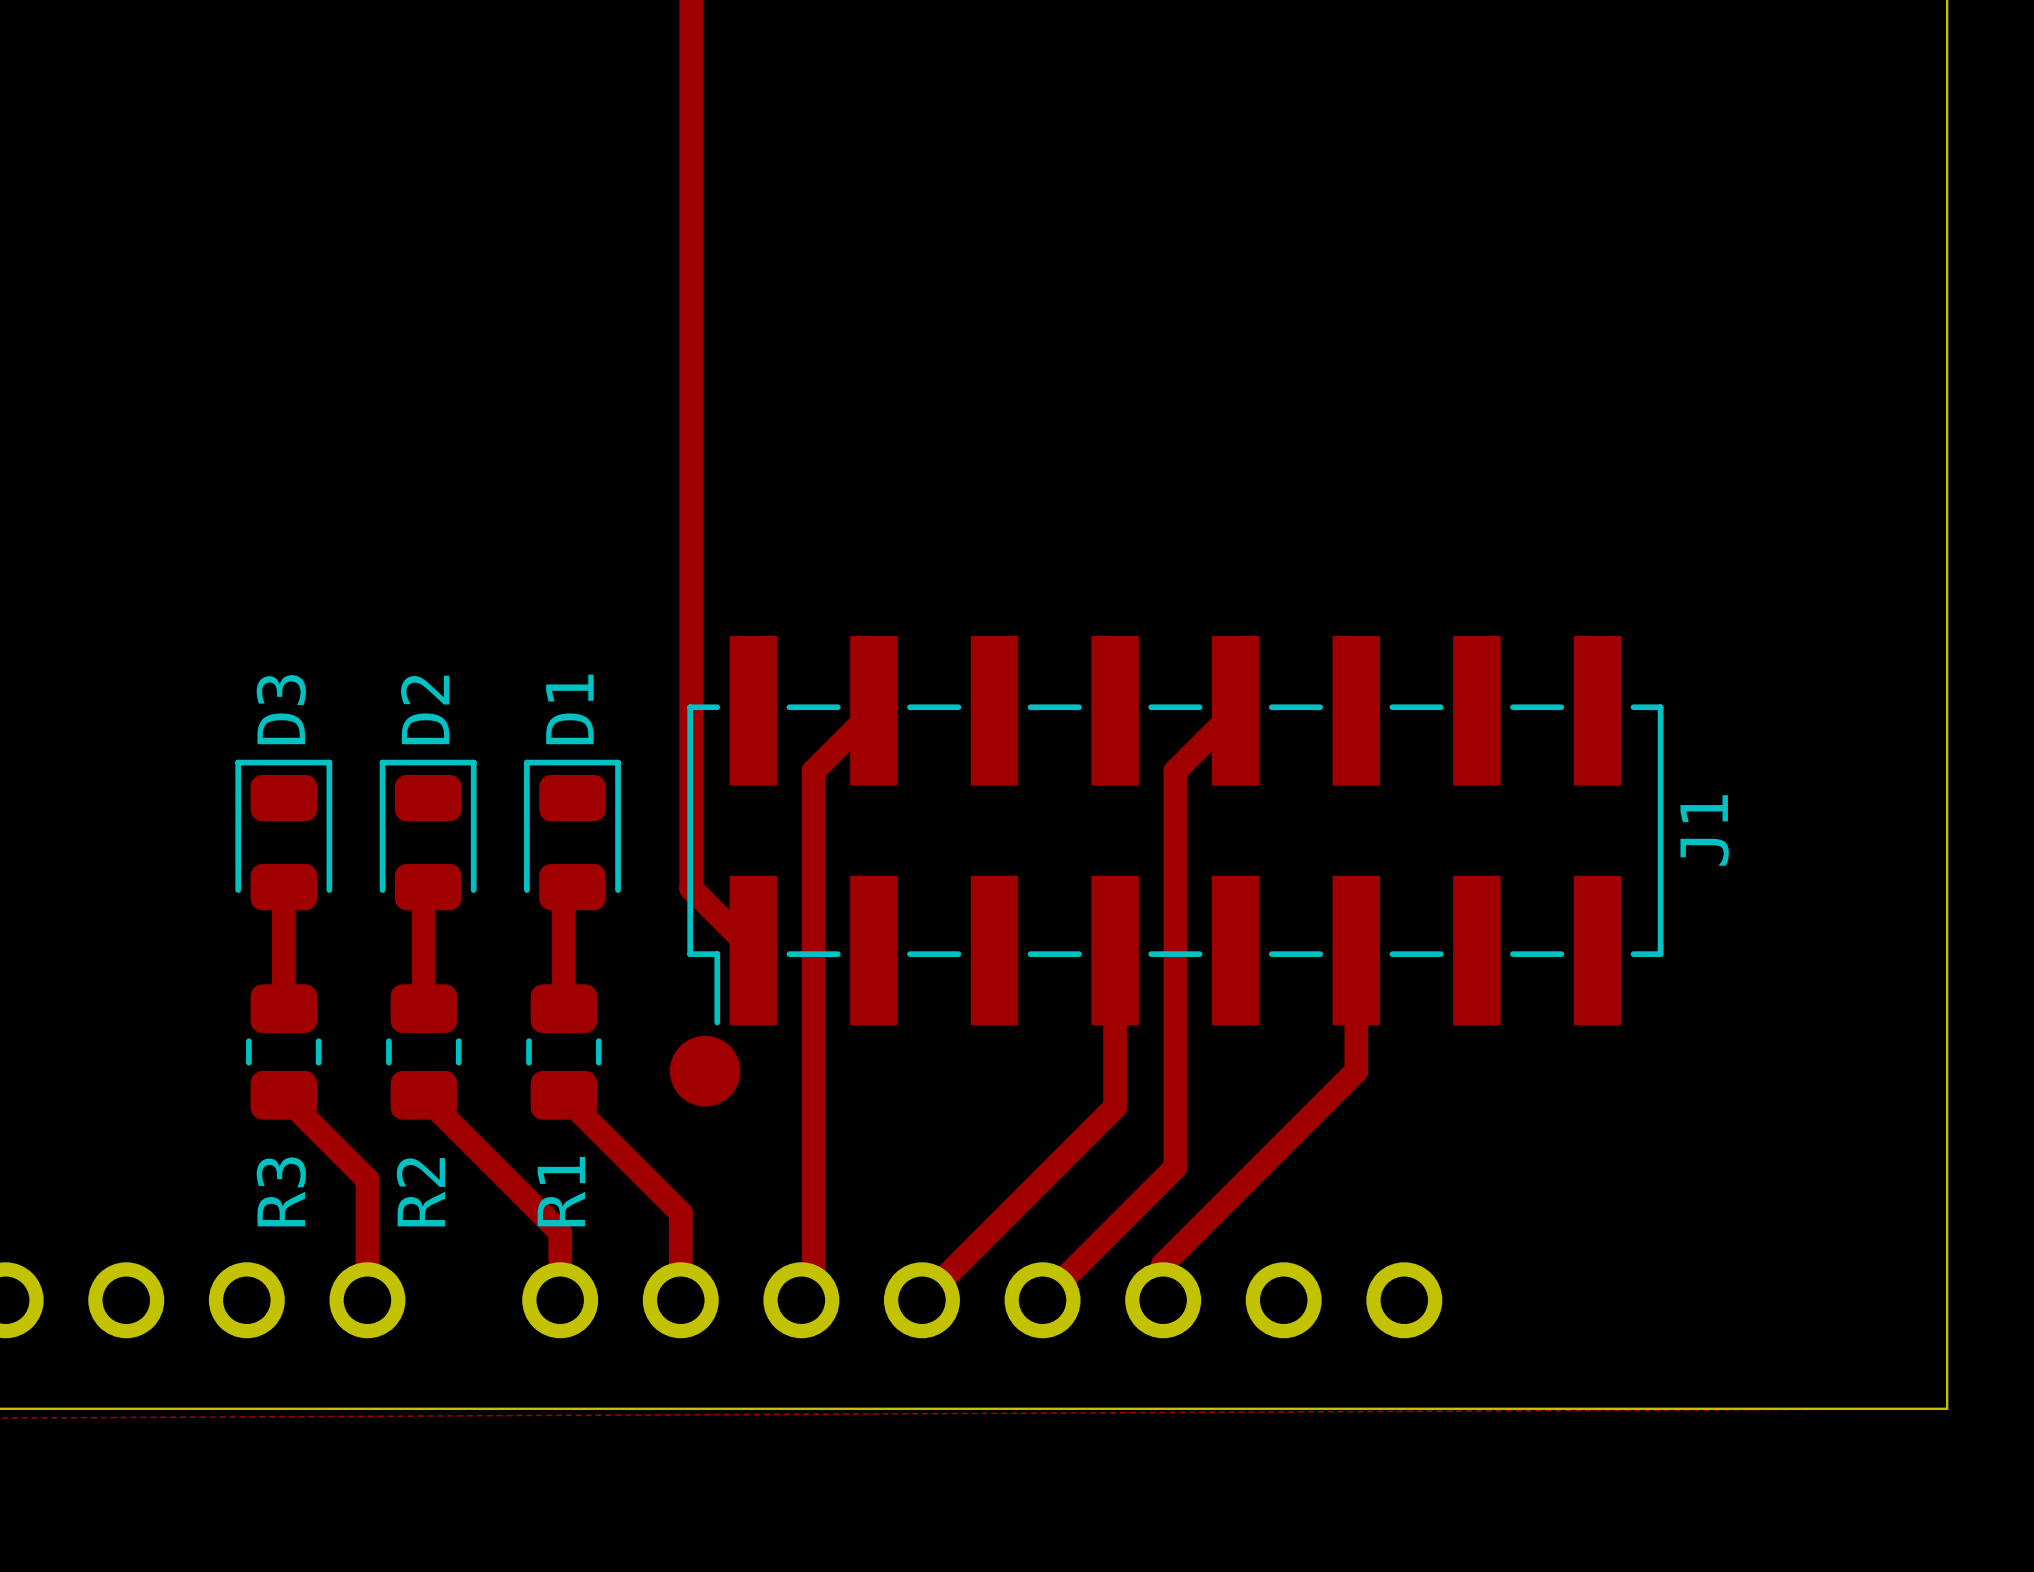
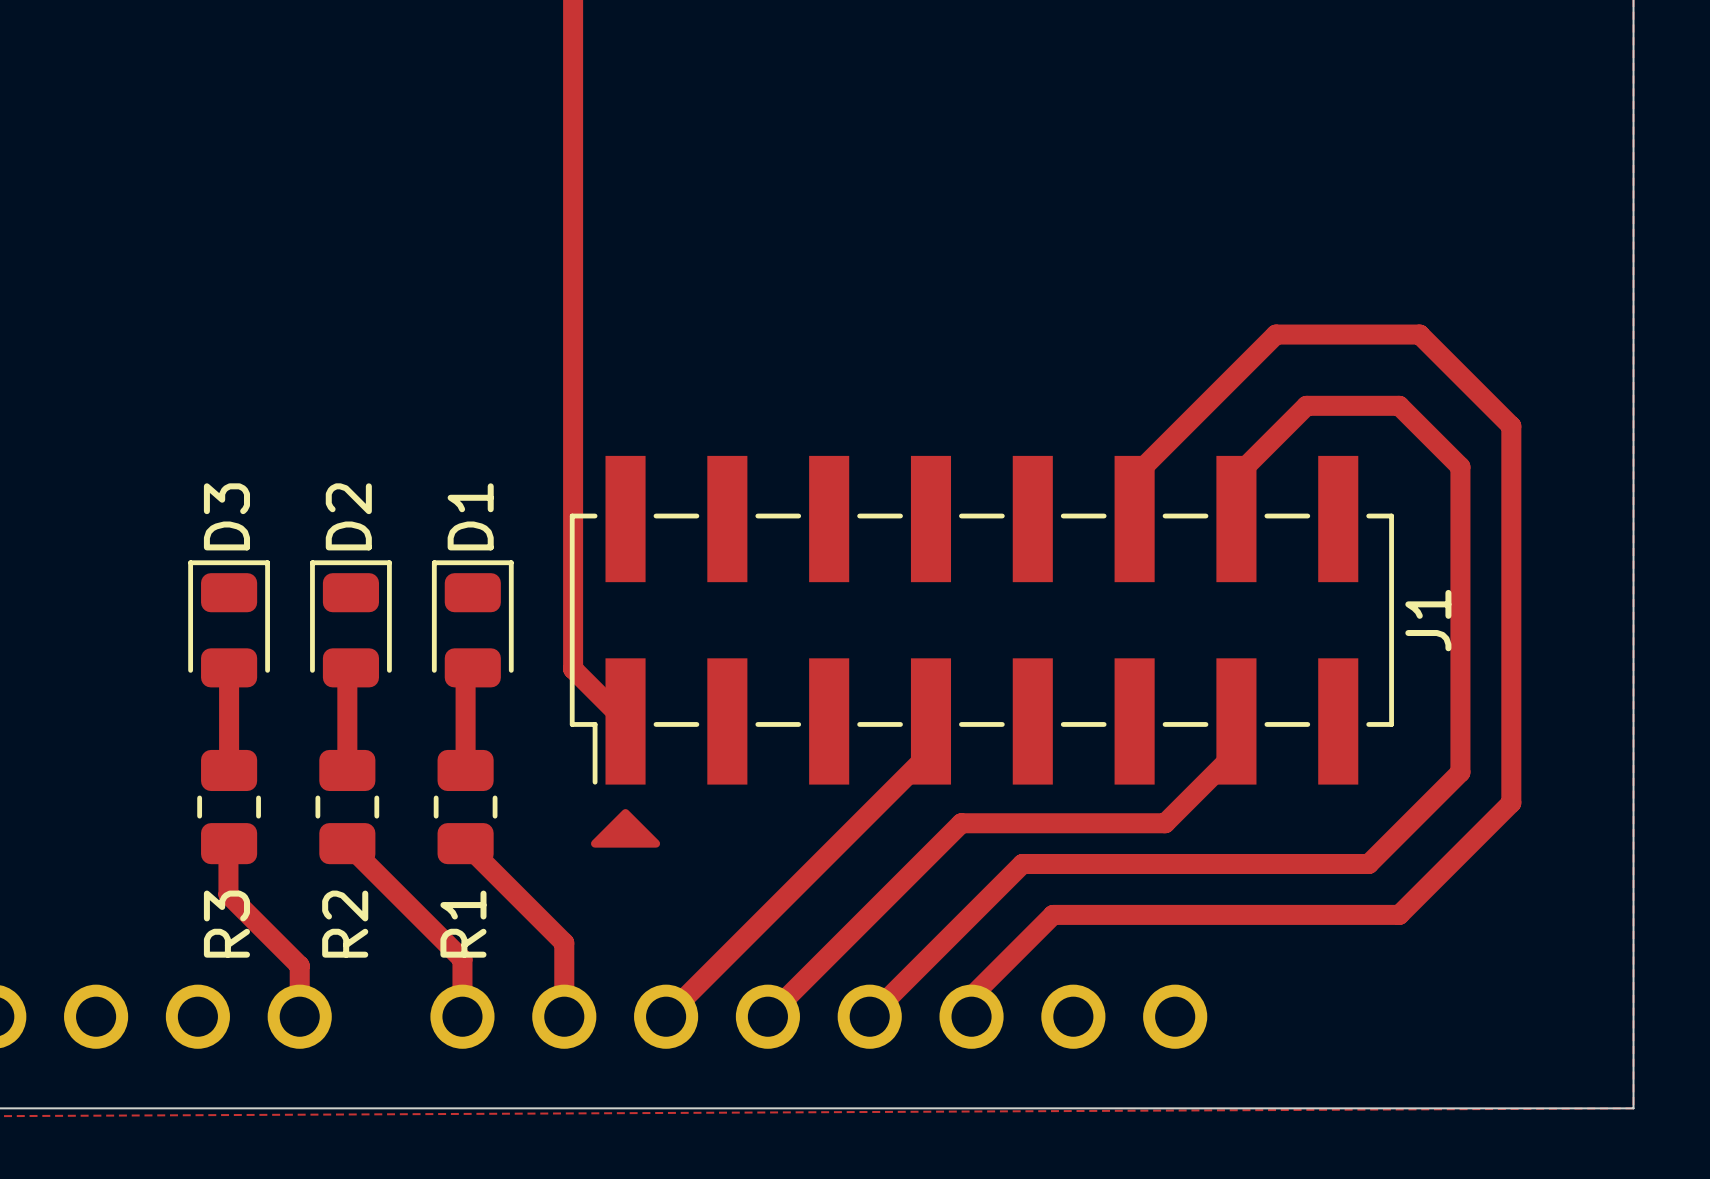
track: (873, 710) (813, 771) (813, 1288) -> none
track: (1235, 710) (1175, 771) (1175, 1167) -> (1236, 519) (1236, 475) (1306, 405) (1399, 405) (1460, 466) (1460, 772) (1368, 863) (1022, 863) (981, 904)
track: (1356, 950) (1356, 1071) (1163, 1264) (1163, 1276) -> (1134, 519) (1134, 475) (1275, 334) (1419, 334) (1511, 426) (1511, 802) (1399, 914) (1053, 914) (971, 996)
track: none -> (1236, 721) (1236, 752) (1165, 823) (961, 823) (930, 853)
track: (1115, 986) (1115, 1107) -> (930, 751) (676, 1006)
drawing: [669, 1035, 741, 1107] -> none
drawing: none -> [590, 809, 661, 848]
track: (283, 1095) (367, 1179) (367, 1239) -> (228, 843) (228, 894) (299, 965)

